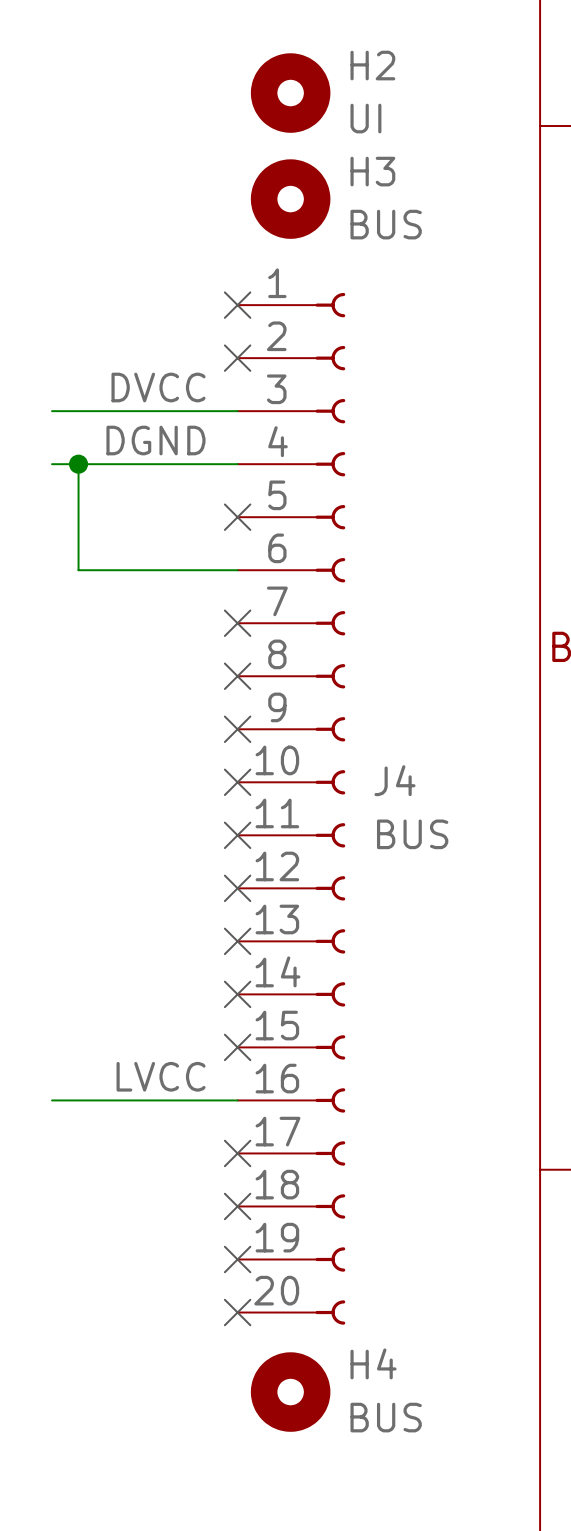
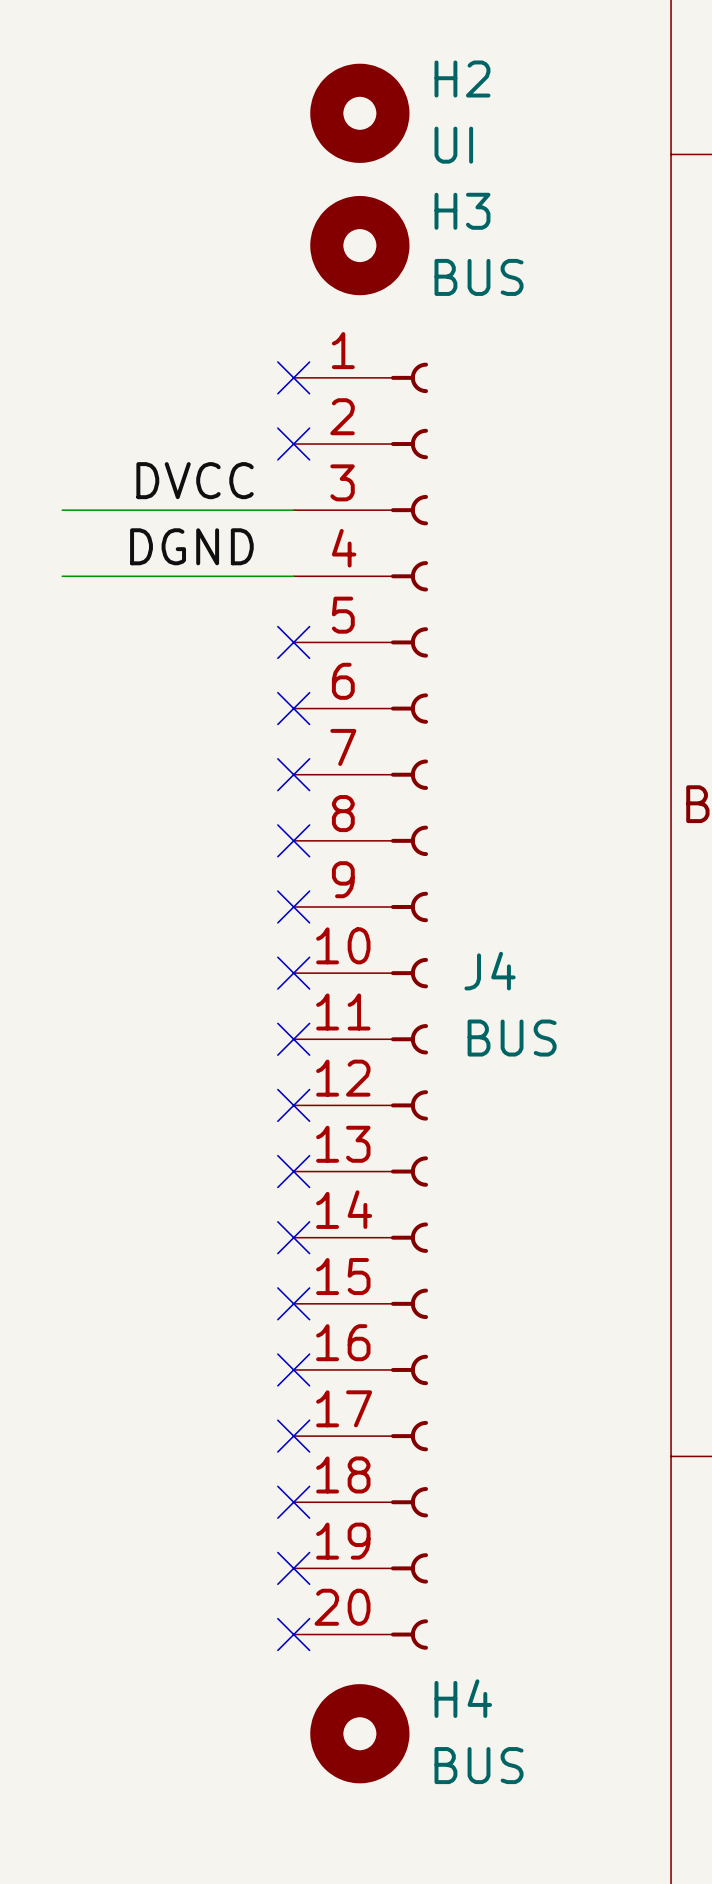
wire: (78, 464) (78, 570) (237, 570) -> none
junction: (78, 464) -> none
no-connect mark: none -> (293, 708)
label: LVCC (161, 1076) -> none
wire: (52, 1100) (237, 1100) -> none
no-connect mark: none -> (293, 1369)

